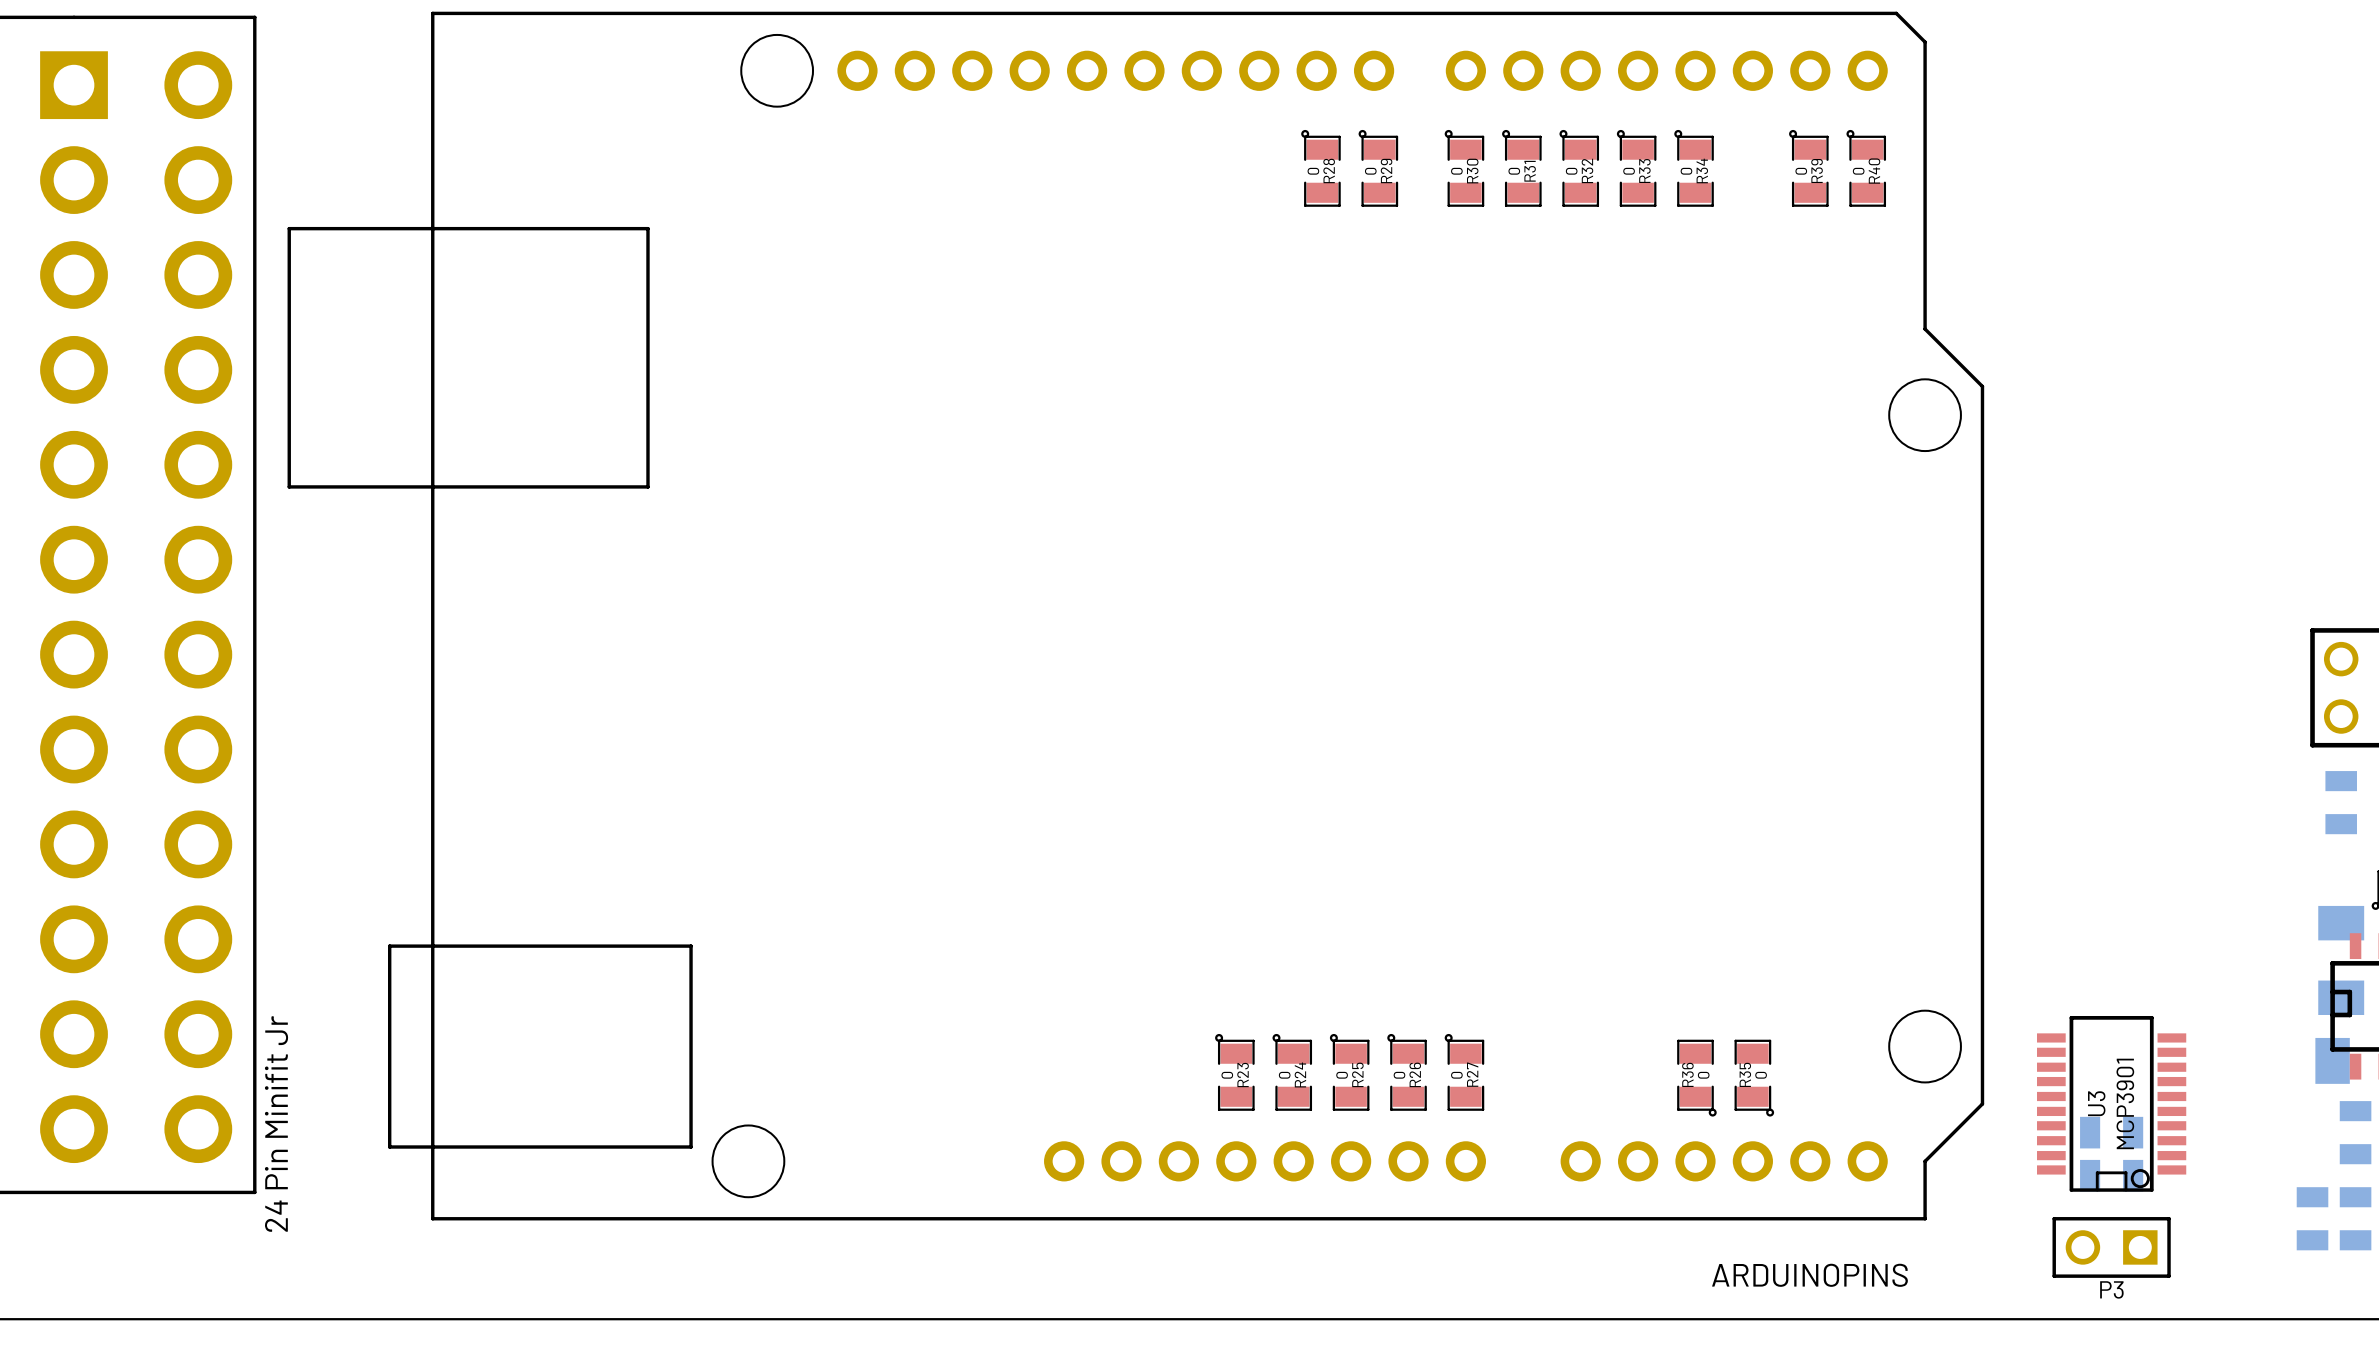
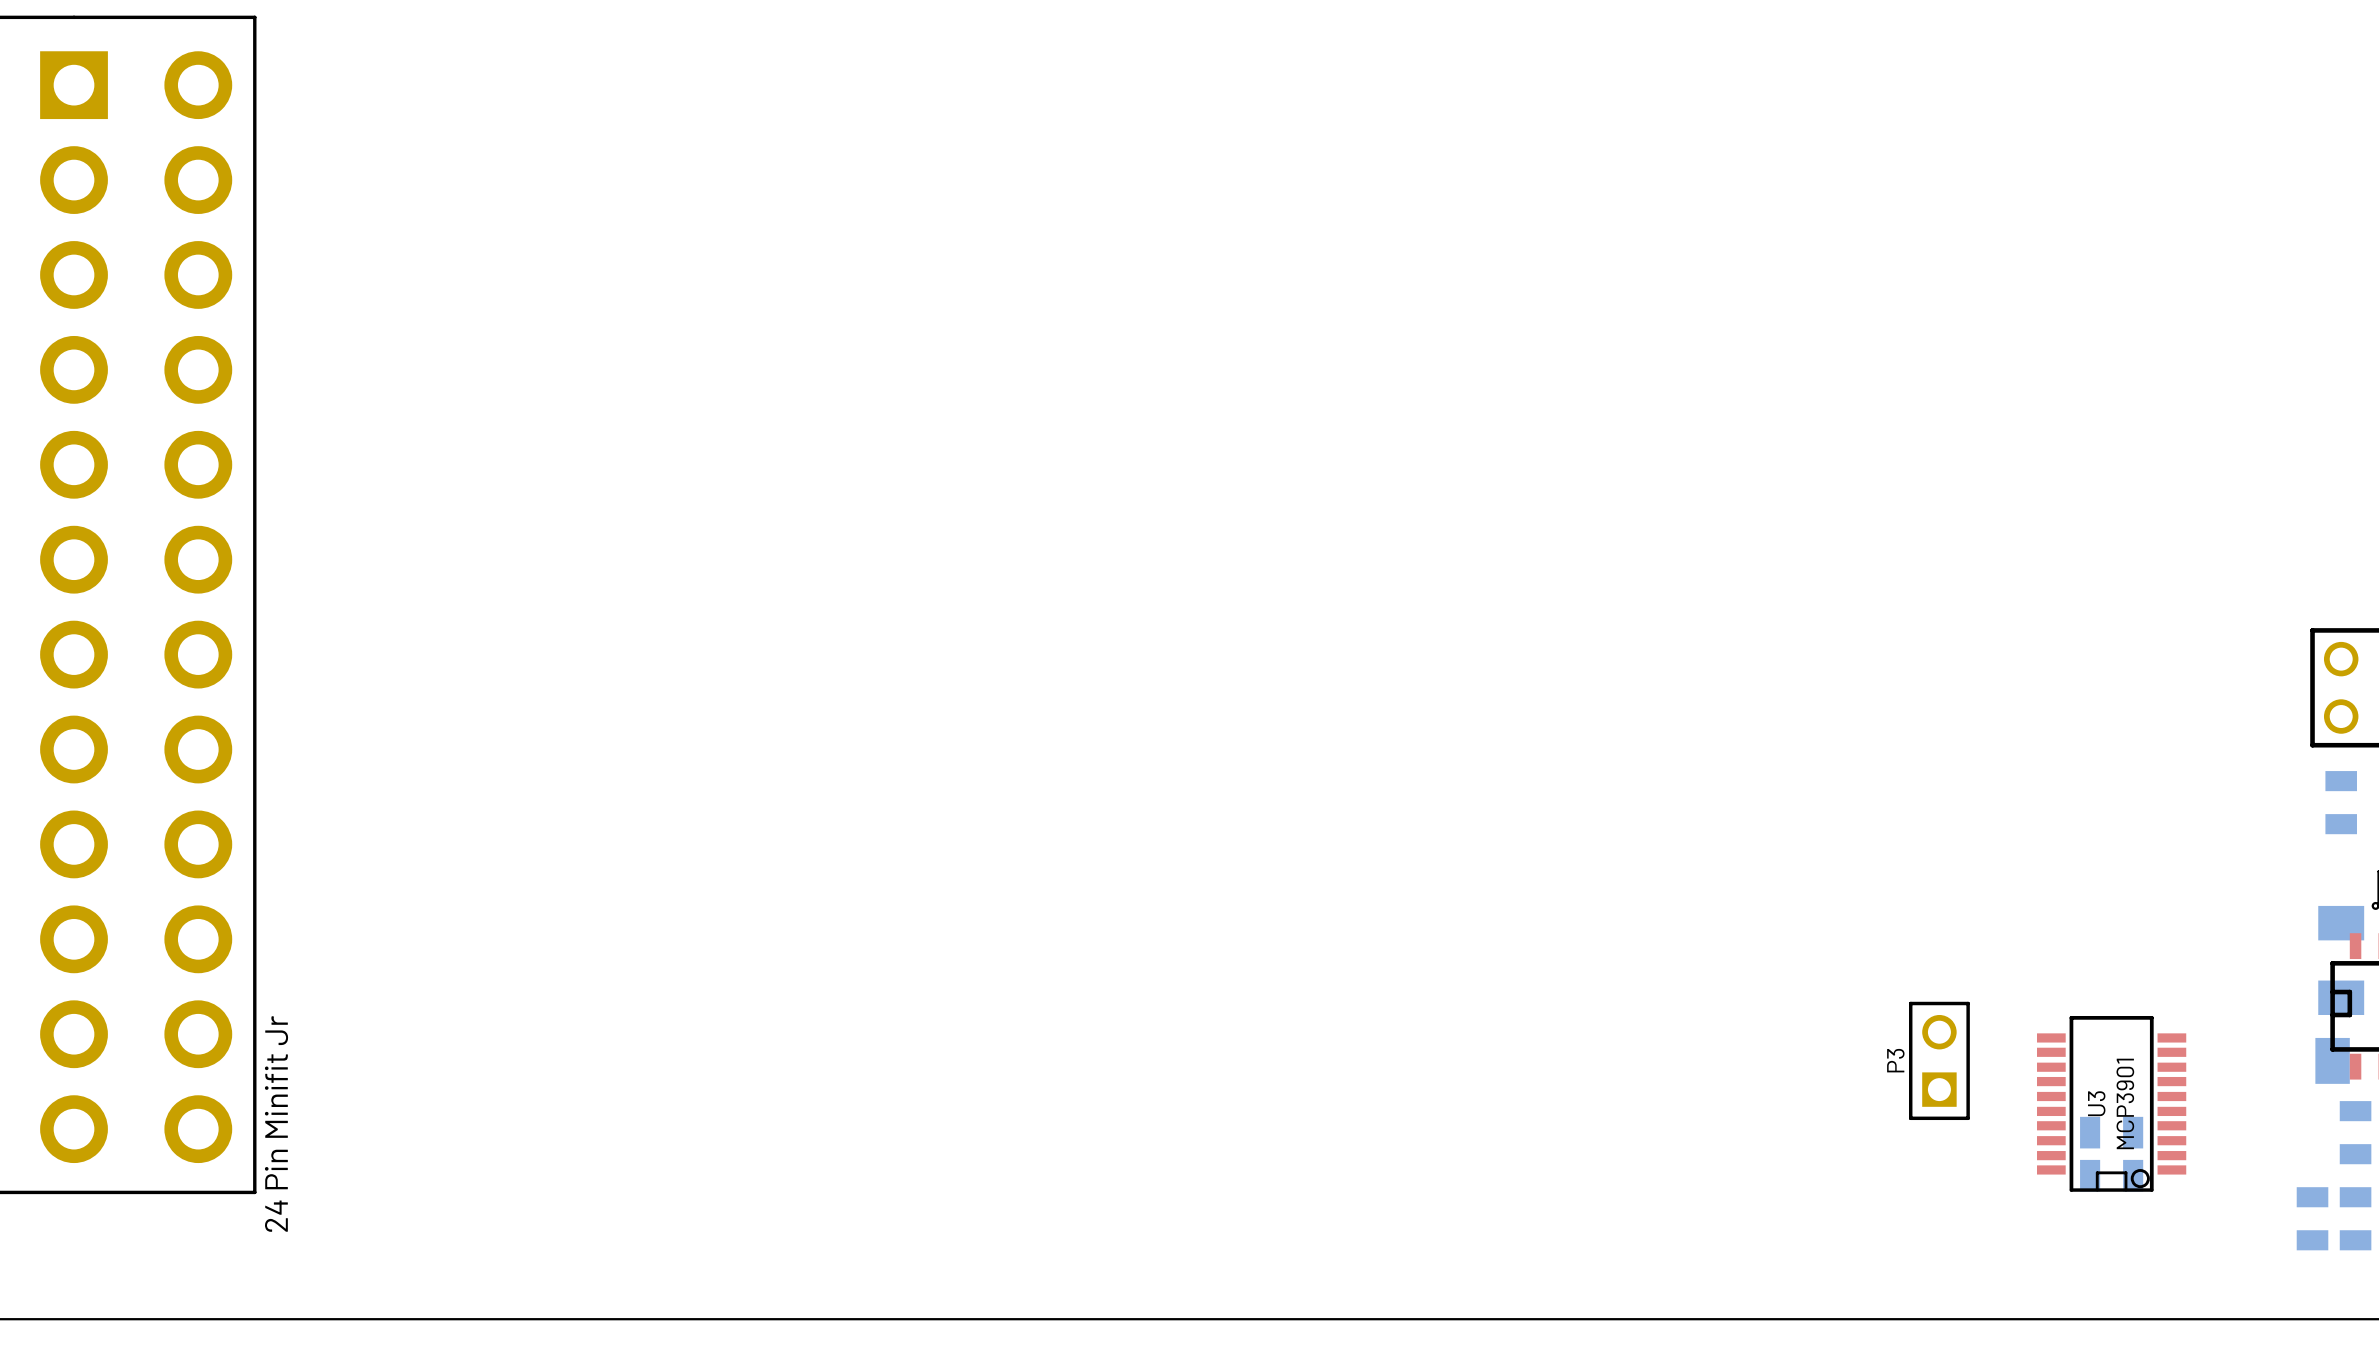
R28: 0 (1320, 168) -> none
R29: 0 (1378, 168) -> none
R30: 0 (1464, 168) -> none
R31: 0 (1521, 168) -> none
R32: 0 (1579, 168) -> none
R33: 0 (1636, 168) -> none
R34: 0 (1694, 168) -> none
R39: 0 (1808, 168) -> none
R40: 0 (1866, 168) -> none
part: ARDUINOPINS (1135, 616) -> none
R23: 0 (1234, 1072) -> none
R24: 0 (1292, 1072) -> none
R25: 0 (1349, 1072) -> none
R26: 0 (1407, 1072) -> none
R27: 0 (1464, 1072) -> none
R36: 0 (1696, 1078) -> none
R35: 0 (1754, 1078) -> none
P3 rotation: 0° (2111, 1247) -> 90° clockwise (1939, 1060)
P3 position: (2111, 1247) -> (1939, 1060)

